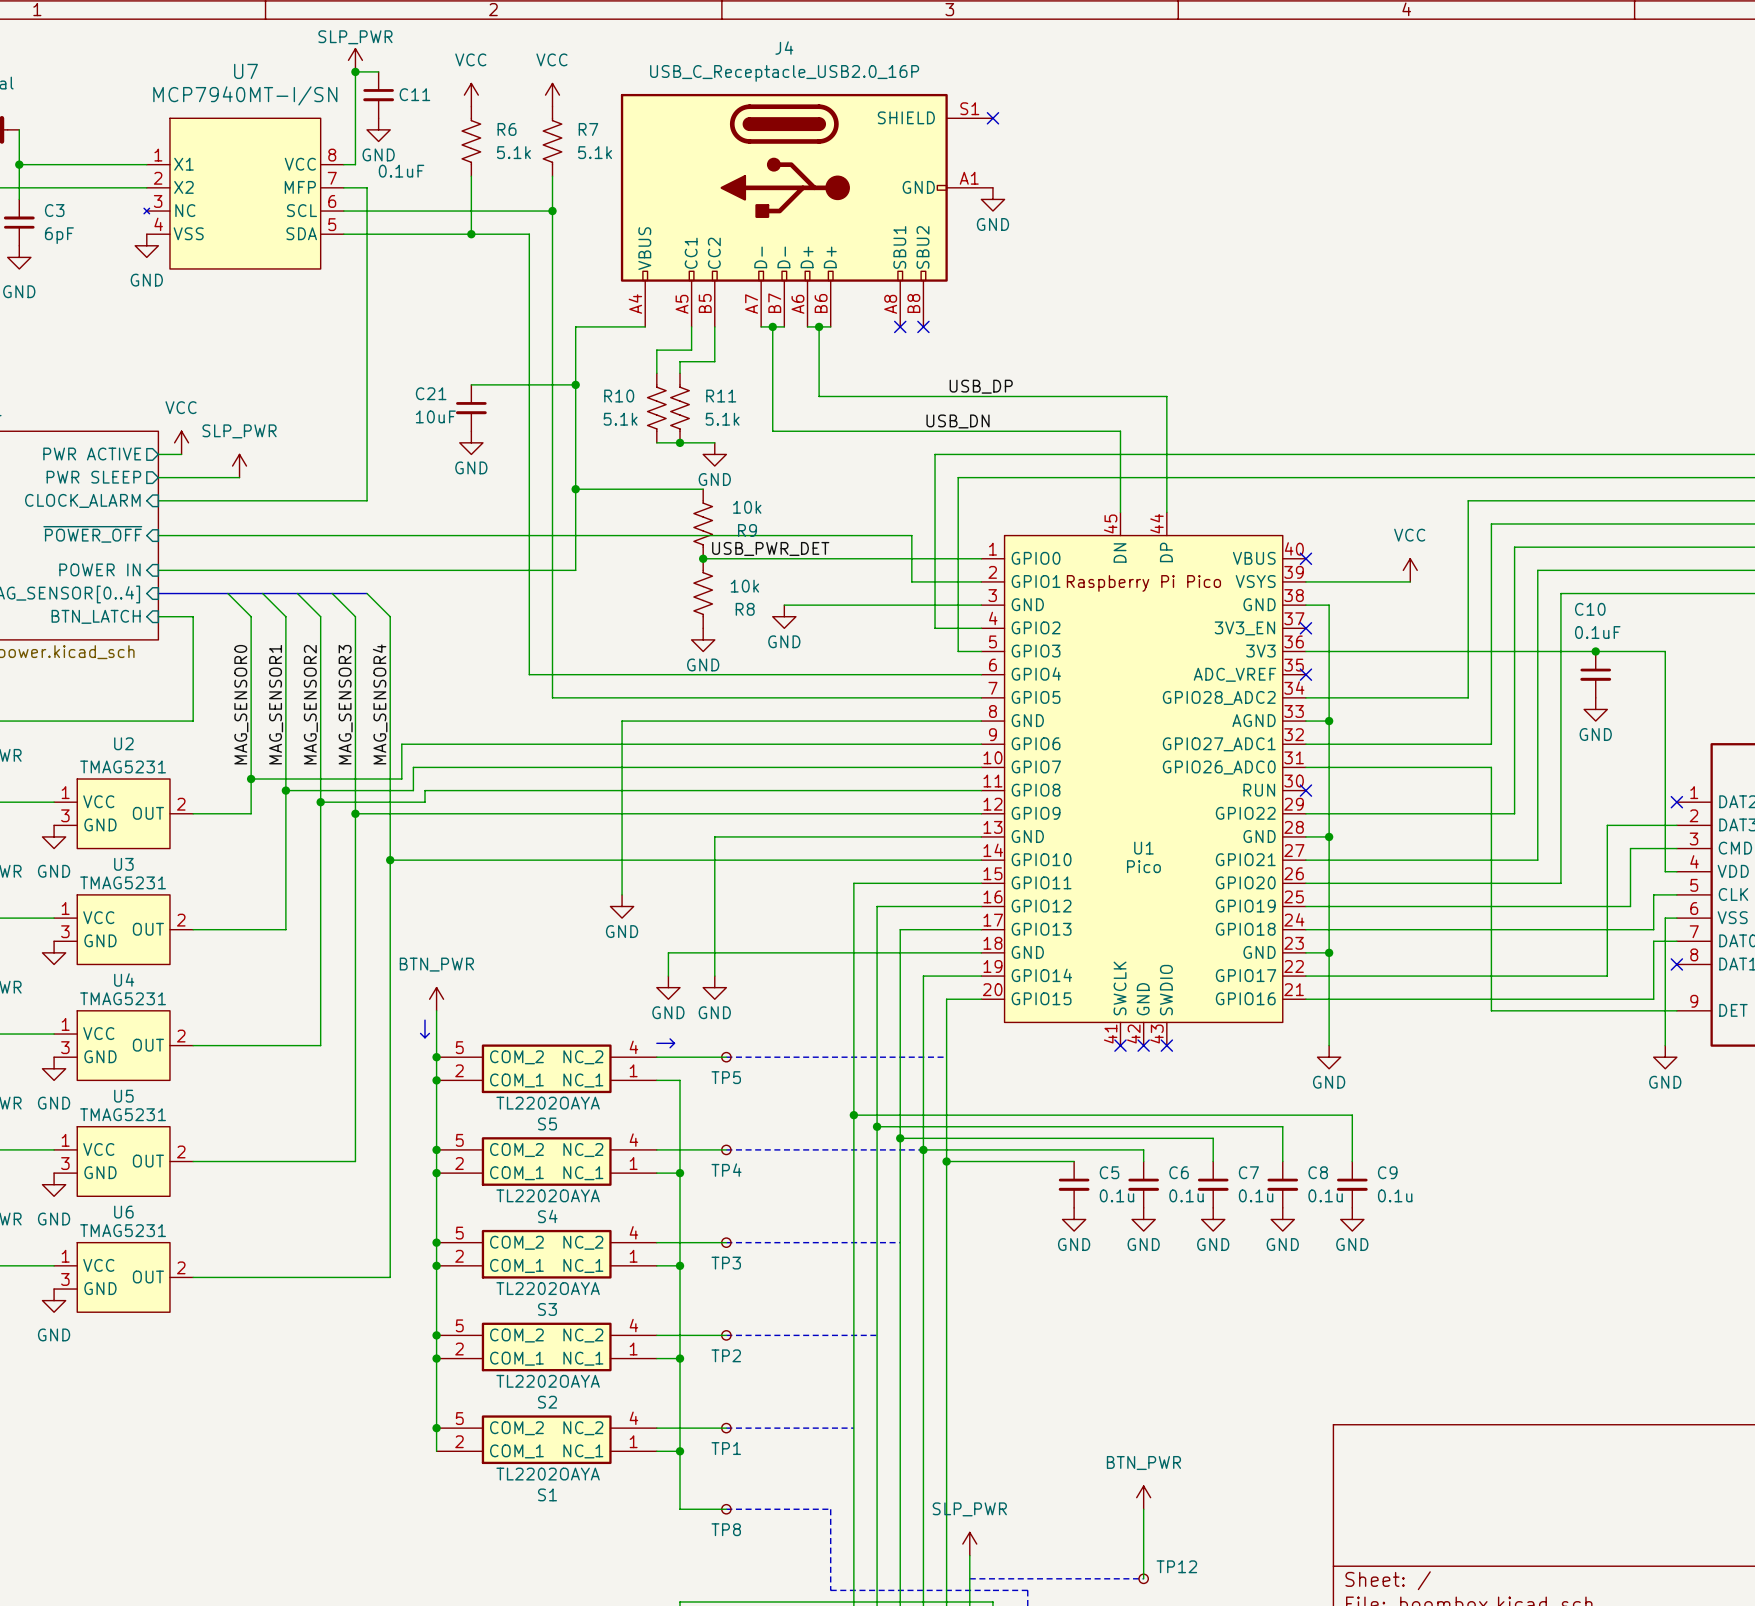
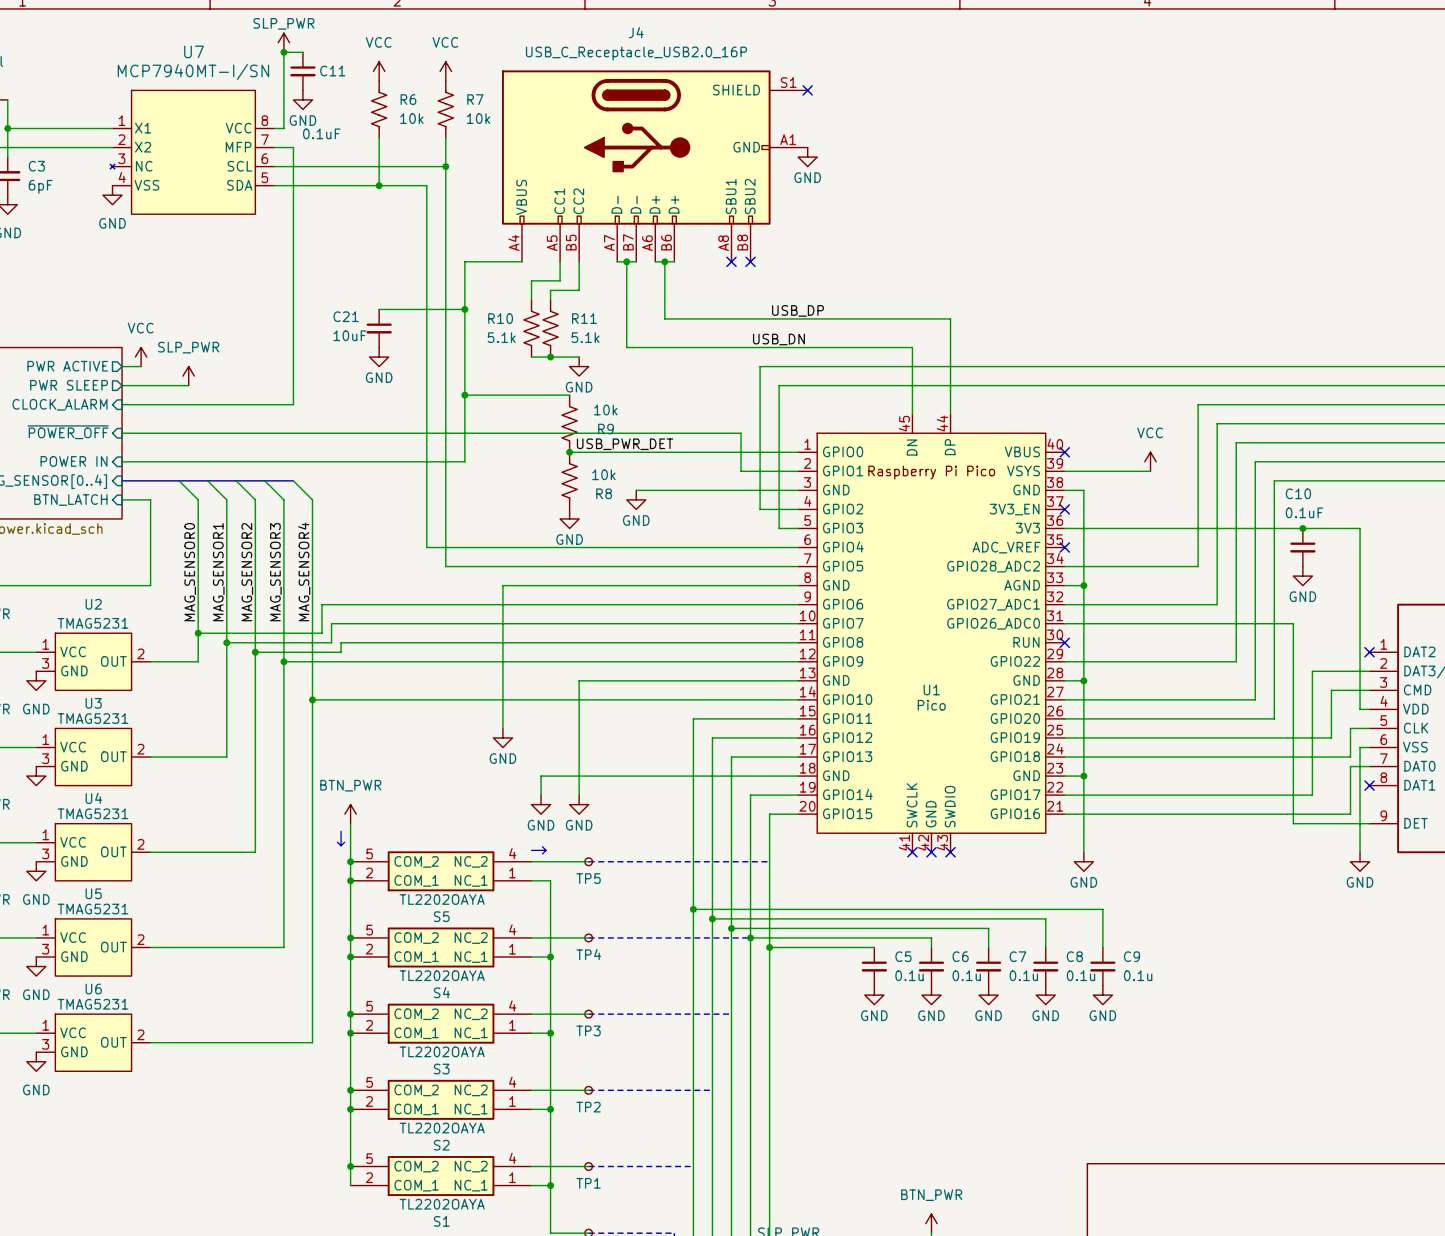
R6 value: 5.1k (513, 152) -> 10k (411, 118)
R7 value: 5.1k (595, 152) -> 10k (478, 118)
wire: (1491, 767) (1491, 1010) (1584, 1010) -> (1217, 623) (1293, 623) (1293, 823)

